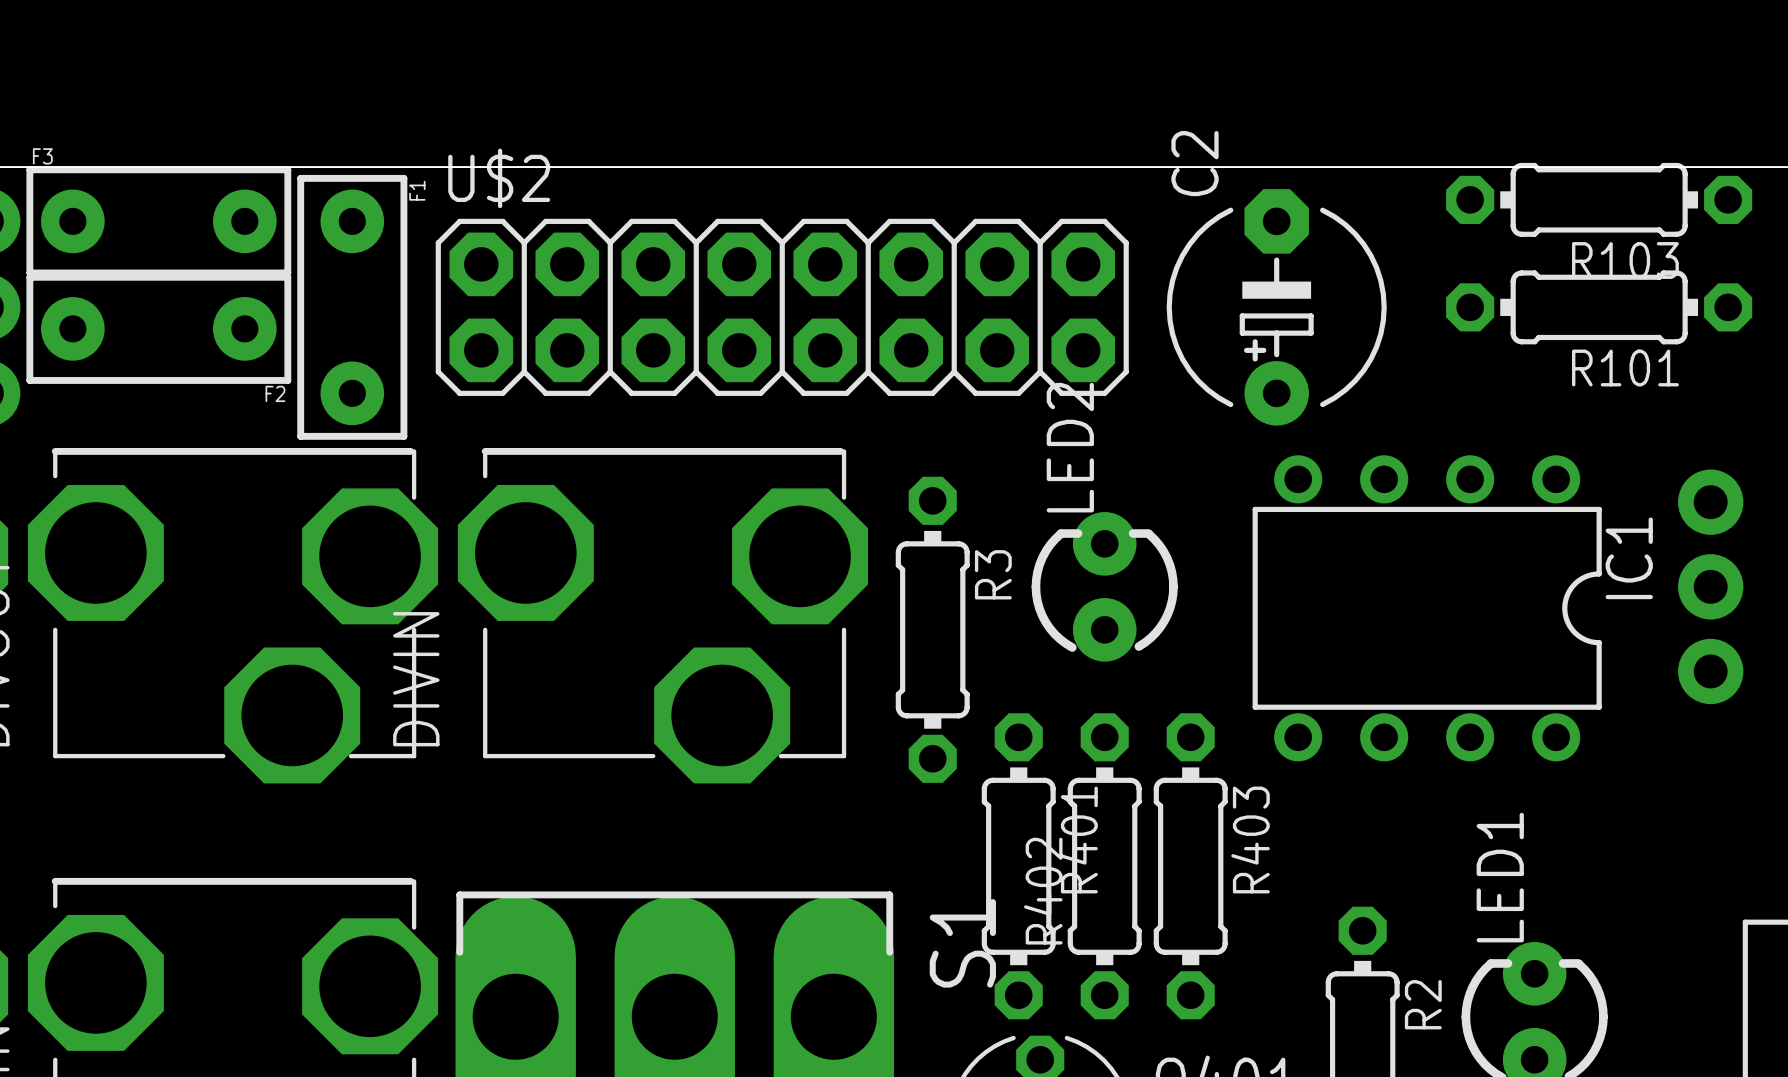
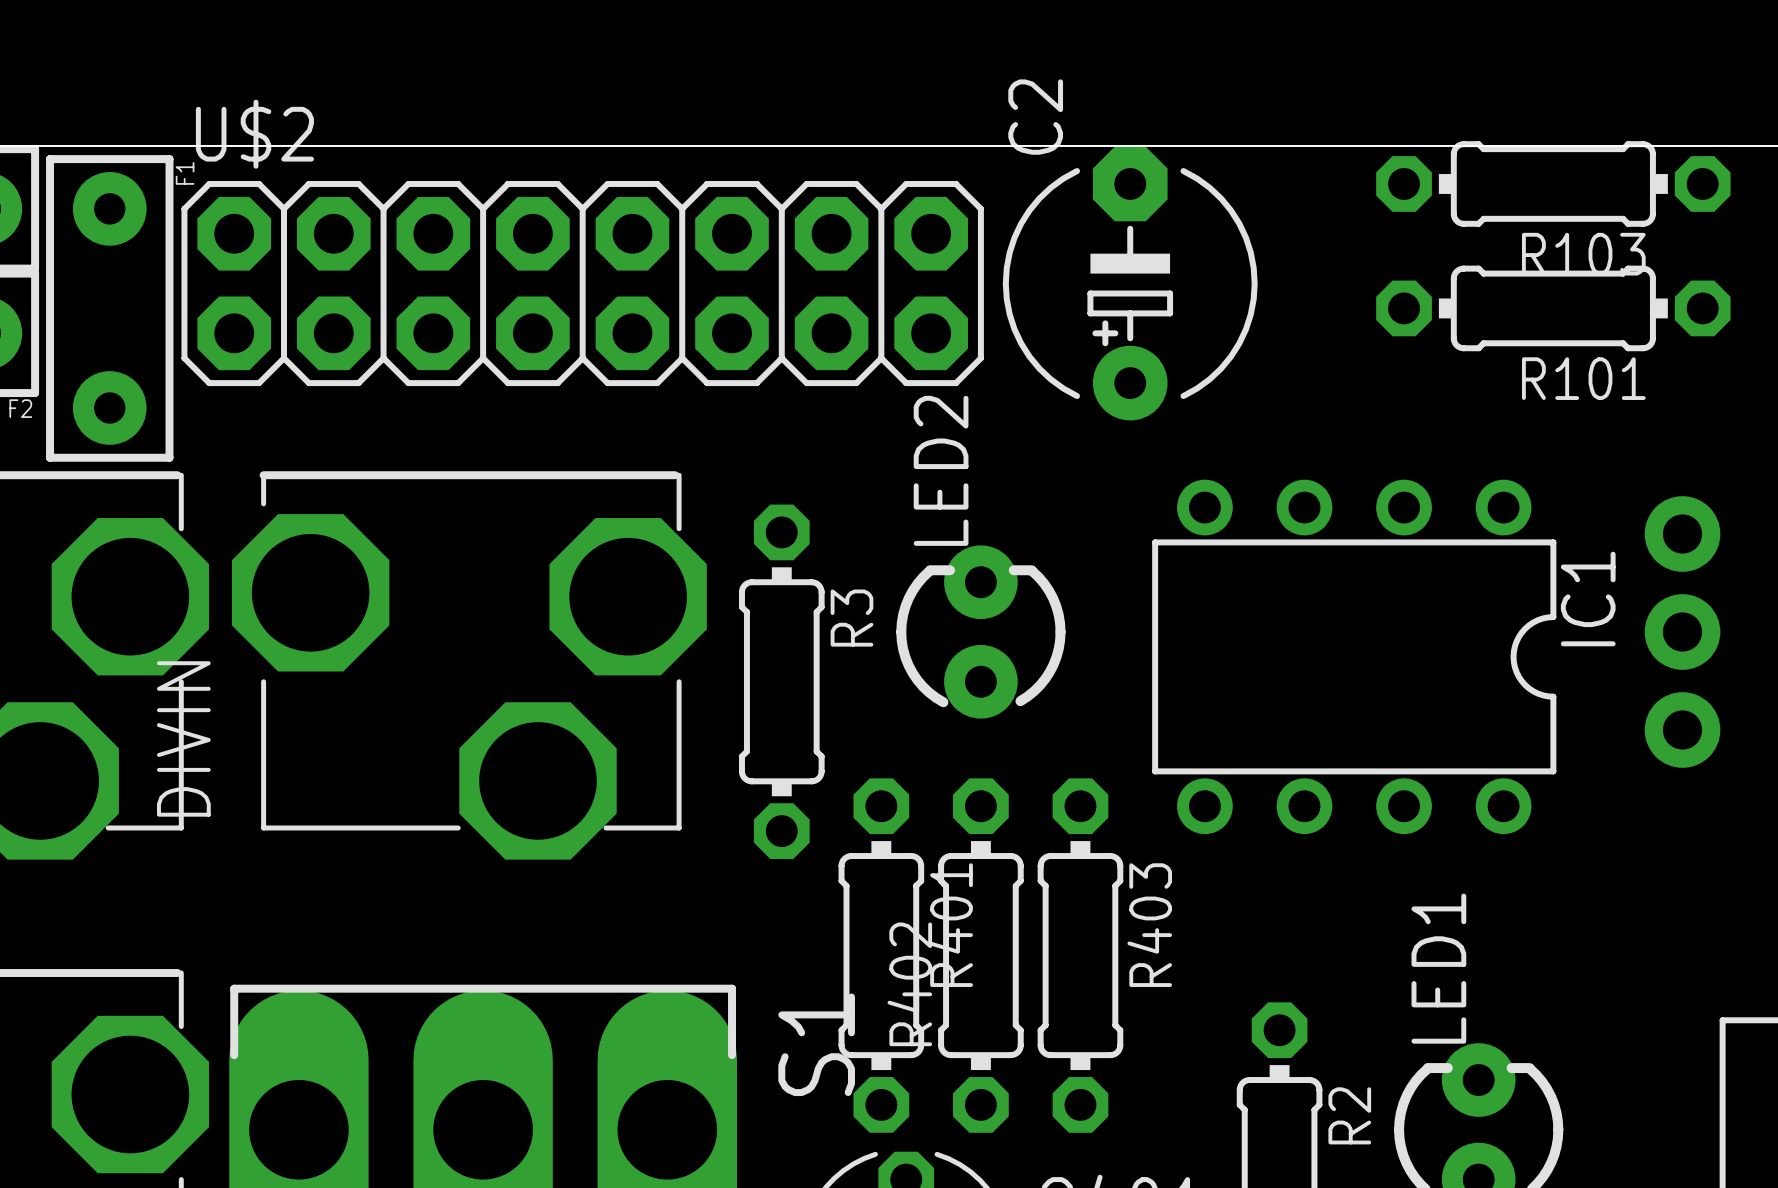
U$2 position: (782, 307) -> (582, 283)
C2 position: (1276, 307) -> (1130, 283)

